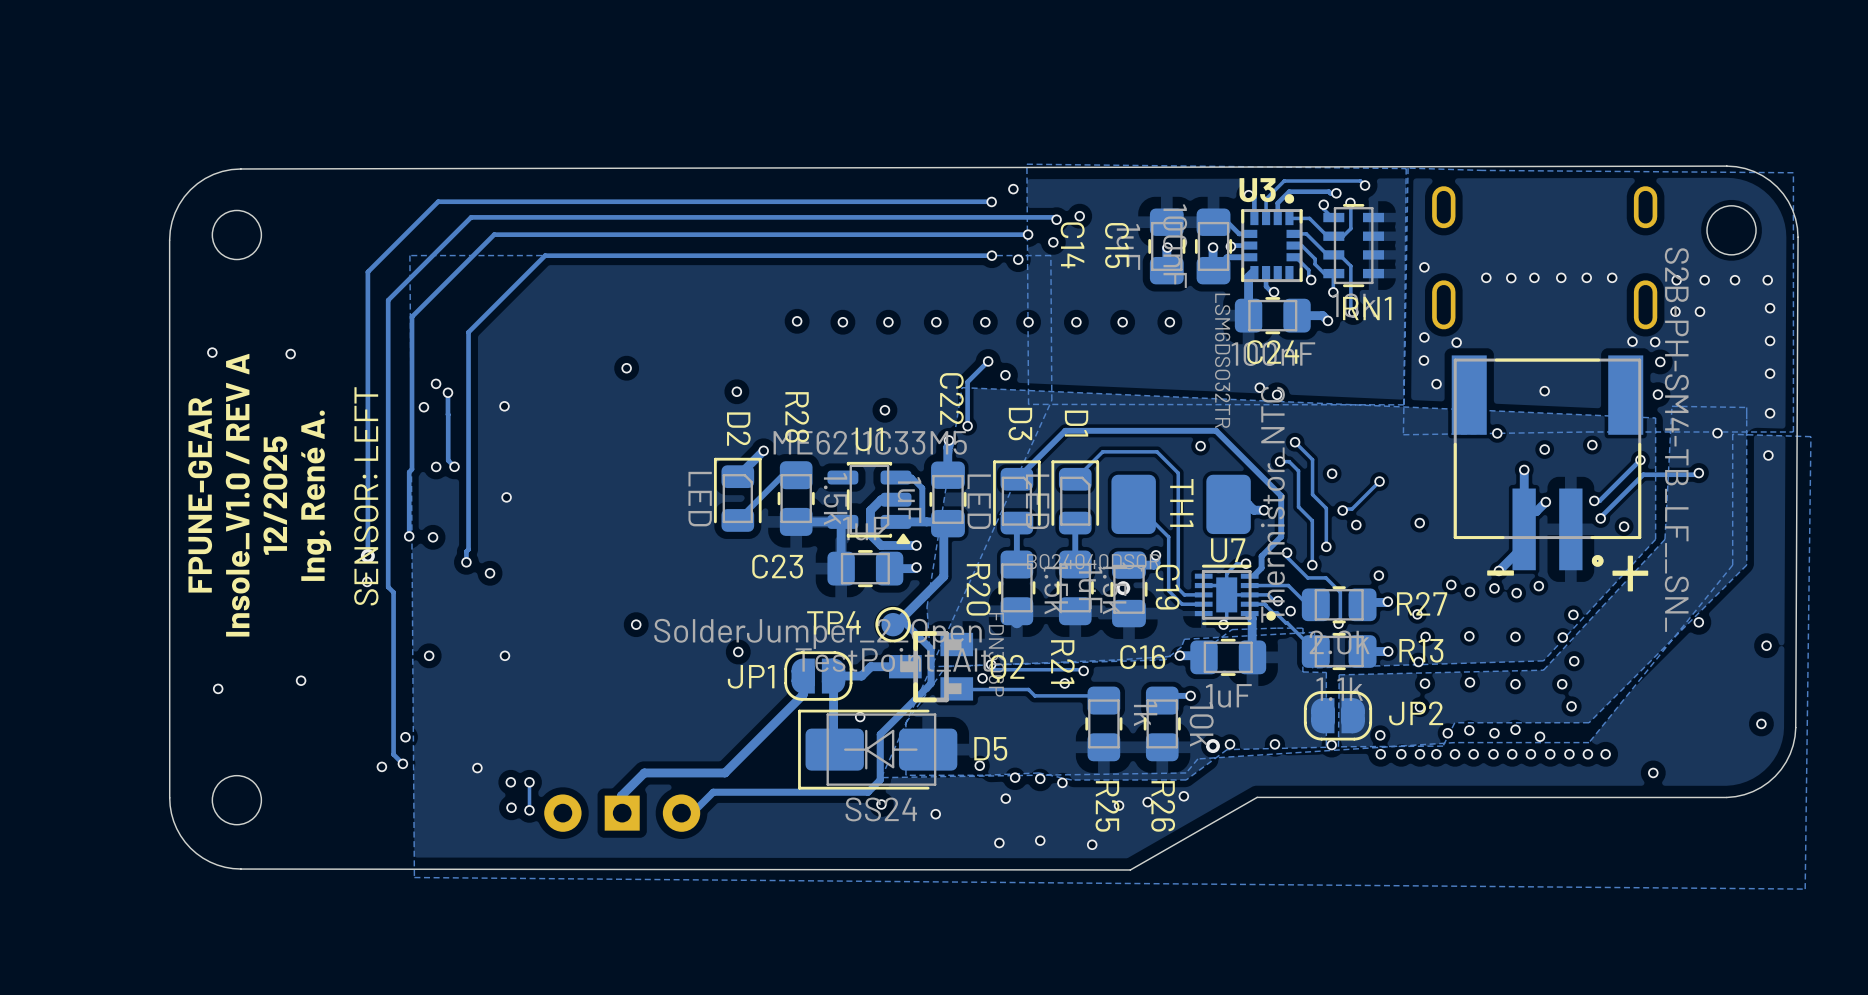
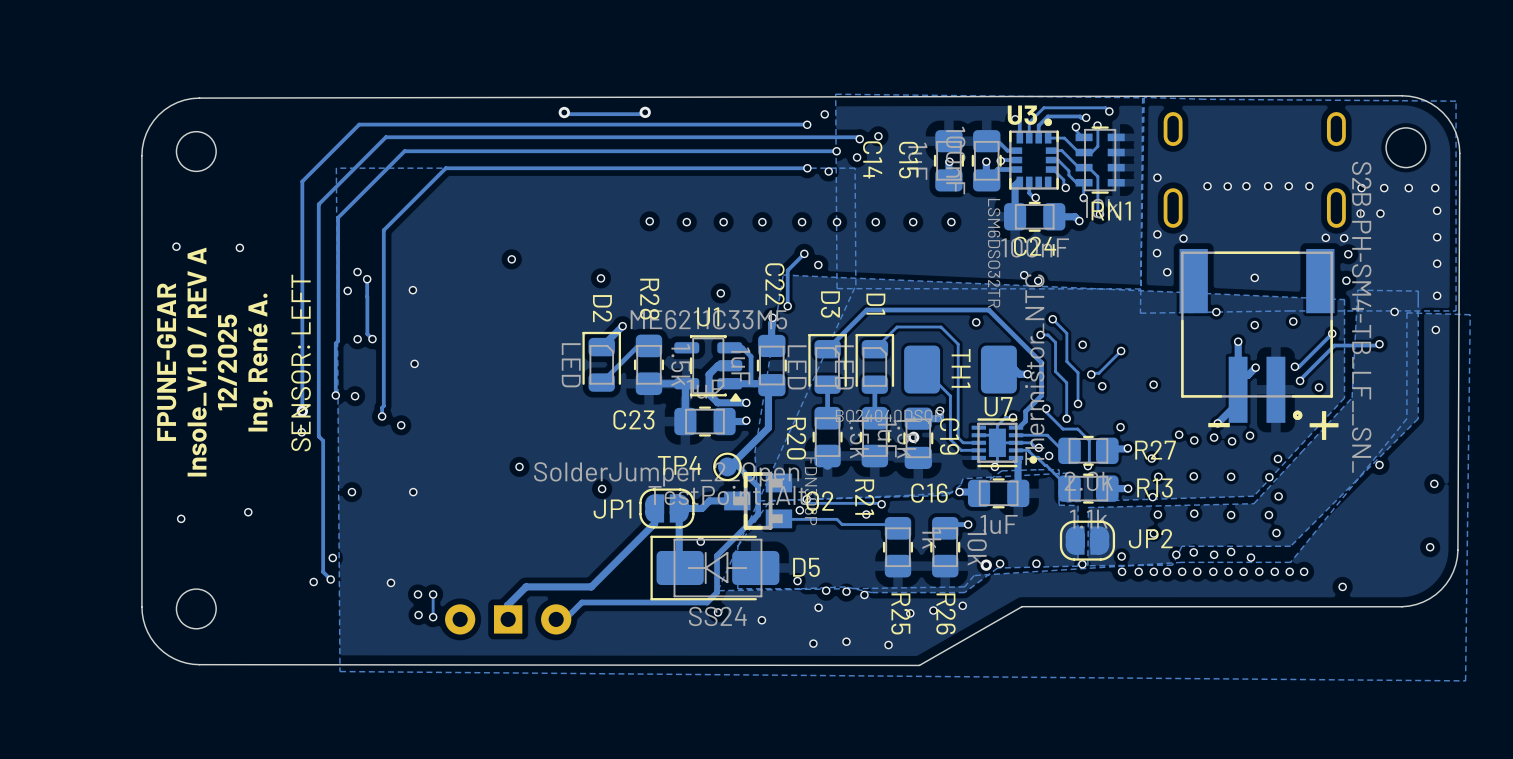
via: none -> (564, 112)
track: none -> (645, 112) (643, 114) (565, 114) (564, 112)
via: none -> (645, 112)

